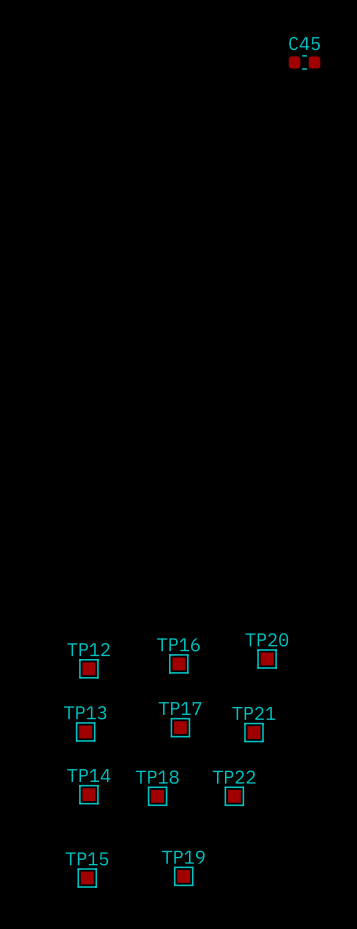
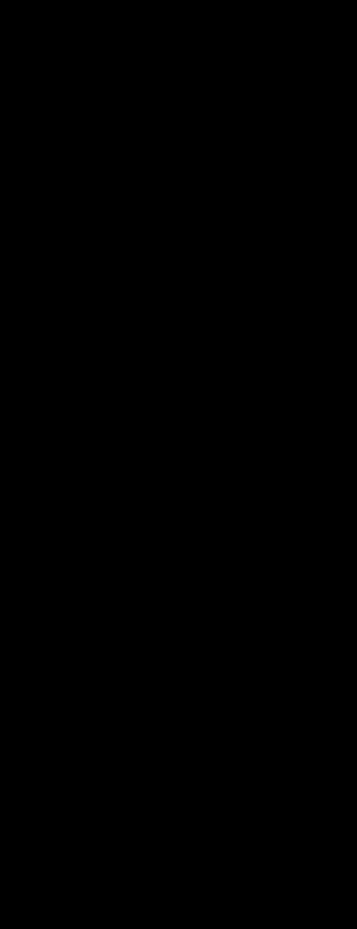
C45: (304, 62) -> none
TP20: (267, 658) -> none
TP16: (178, 663) -> none
TP12: (88, 668) -> none
TP17: (180, 727) -> none
TP13: (85, 731) -> none
TP21: (253, 732) -> none
TP14: (88, 794) -> none
TP18: (157, 796) -> none
TP22: (234, 796) -> none
TP19: (183, 876) -> none
TP15: (87, 878) -> none

